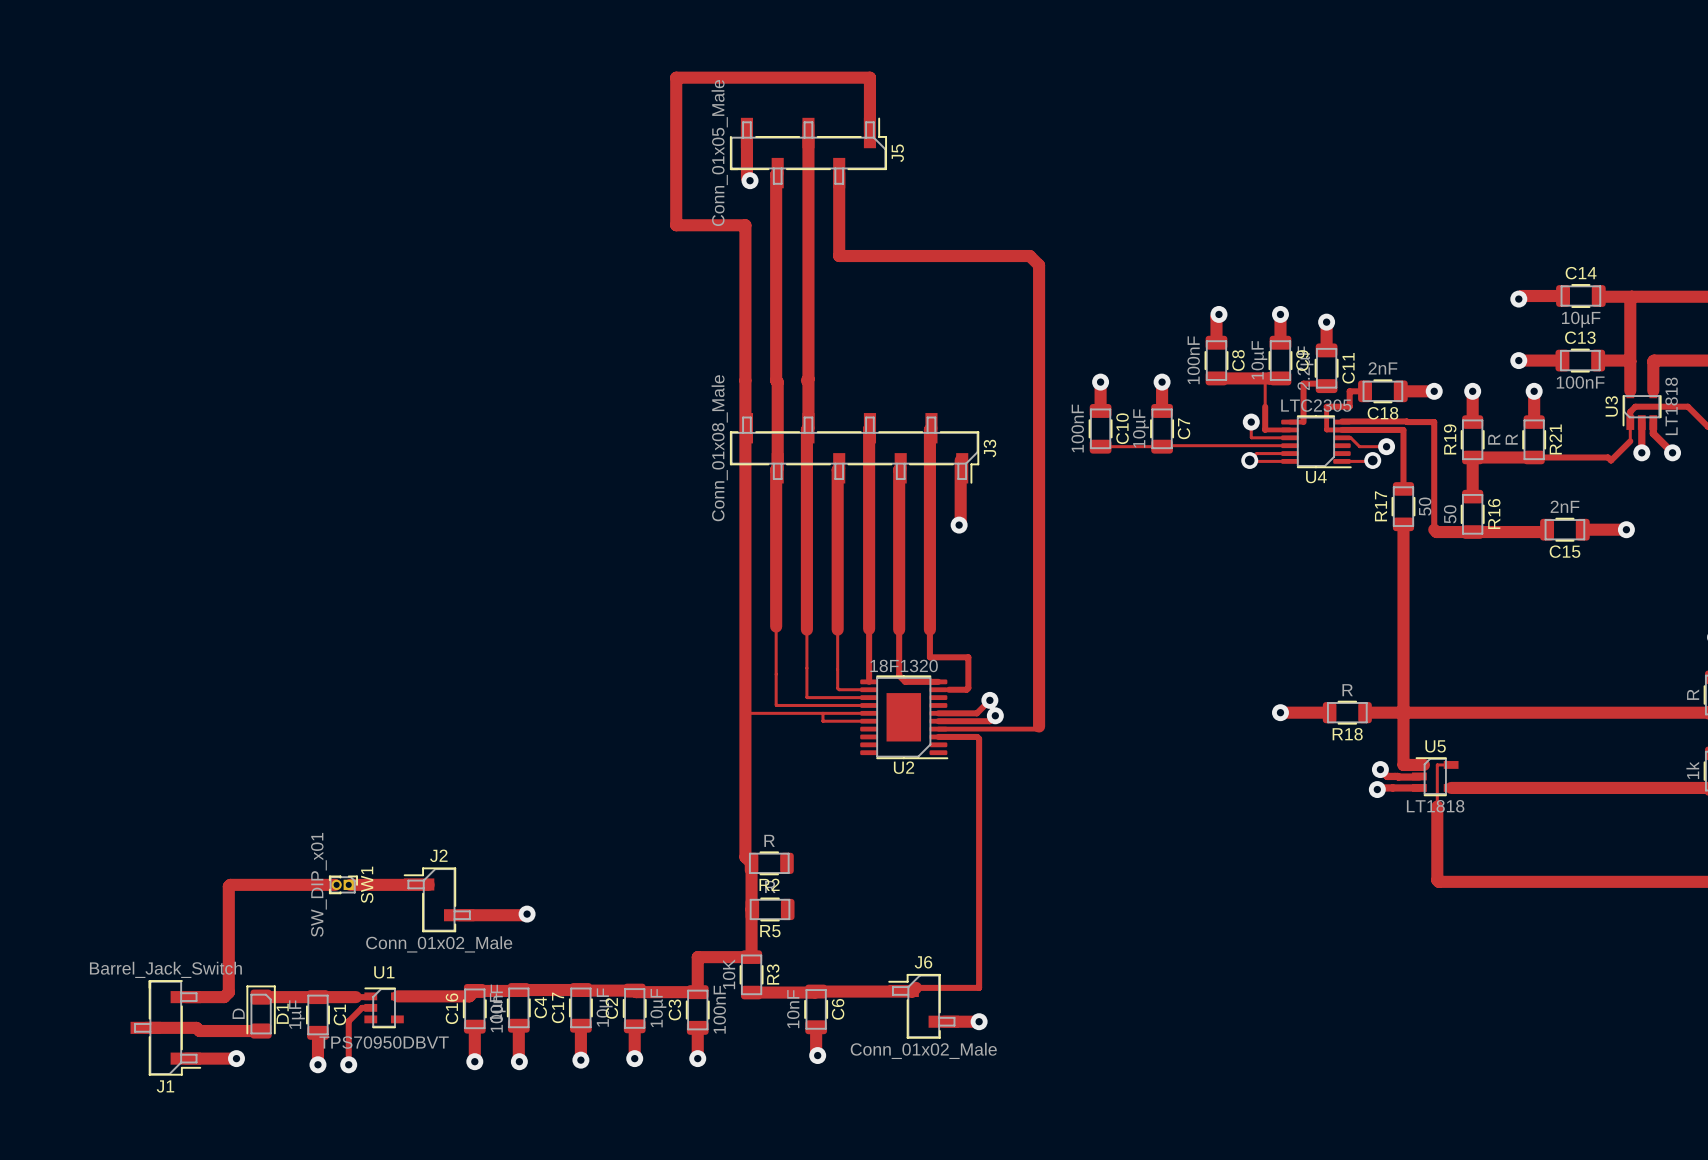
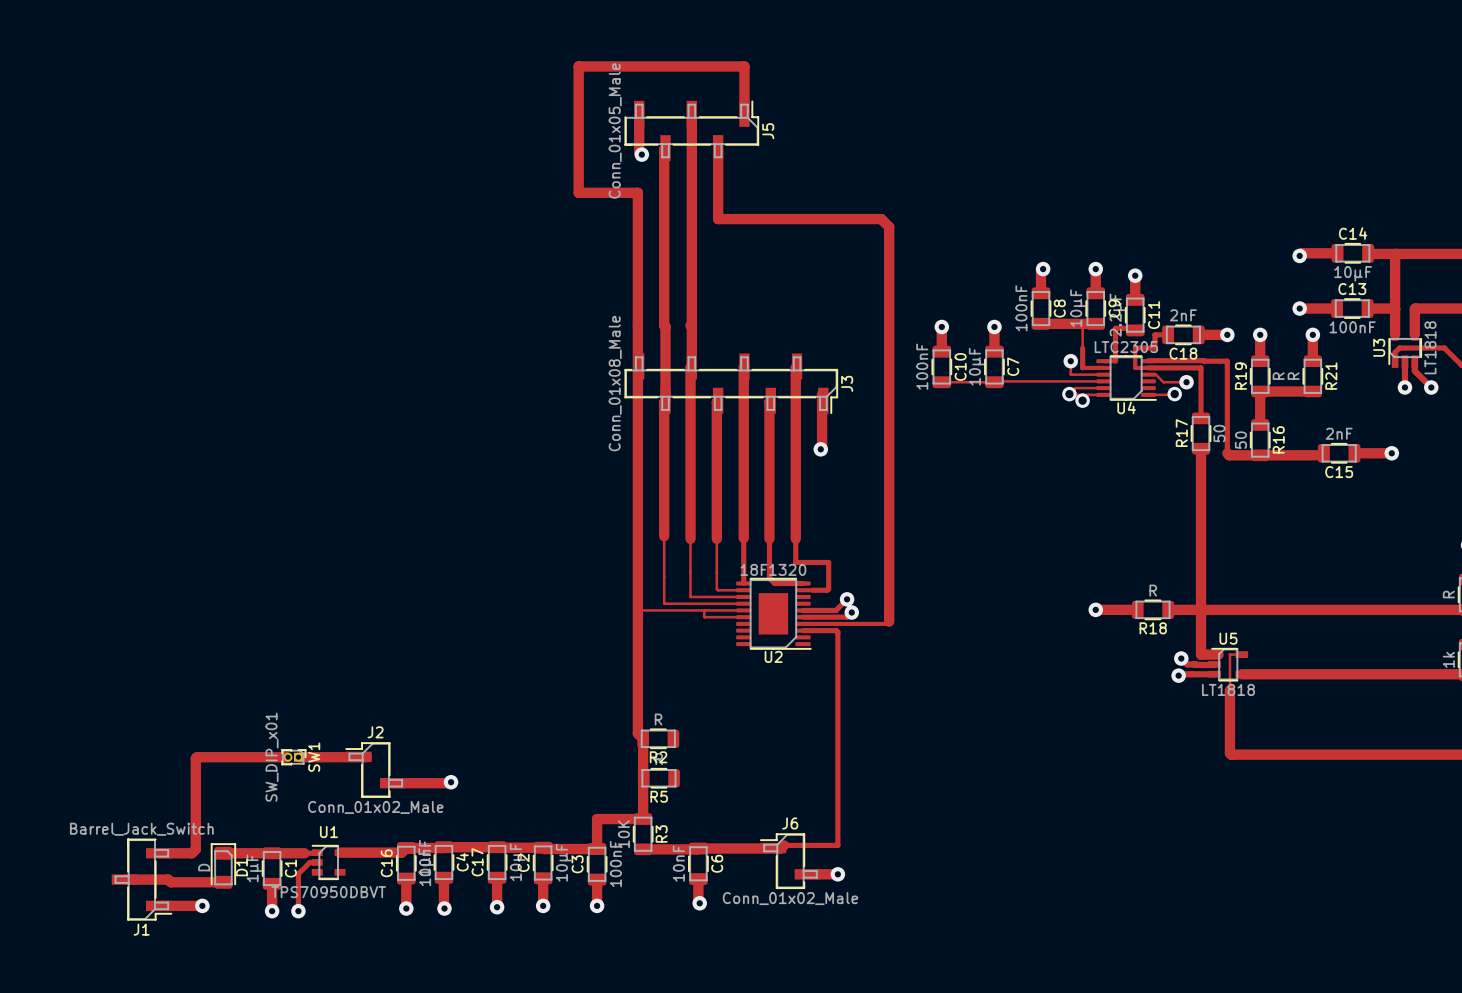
track: (1630, 422) (1630, 441) (1611, 460) (1608, 457) (1534, 457) -> none
via: none -> (1082, 400)

